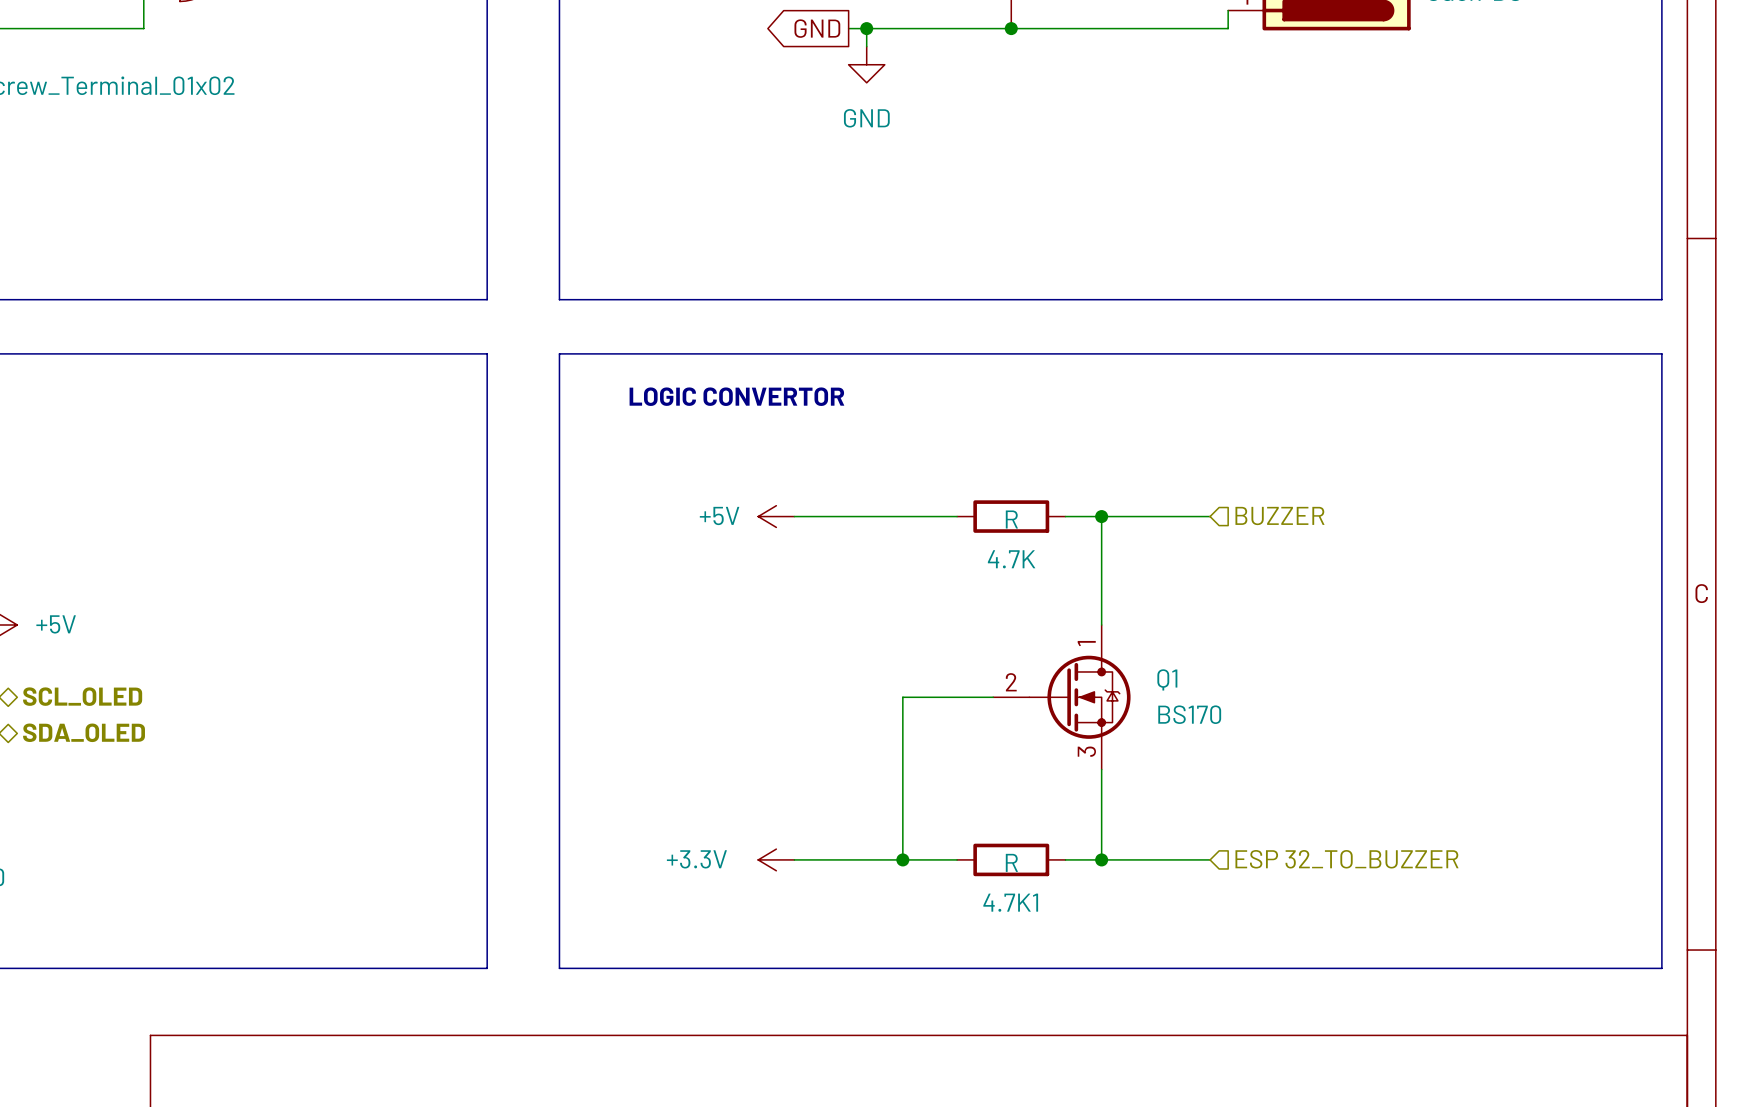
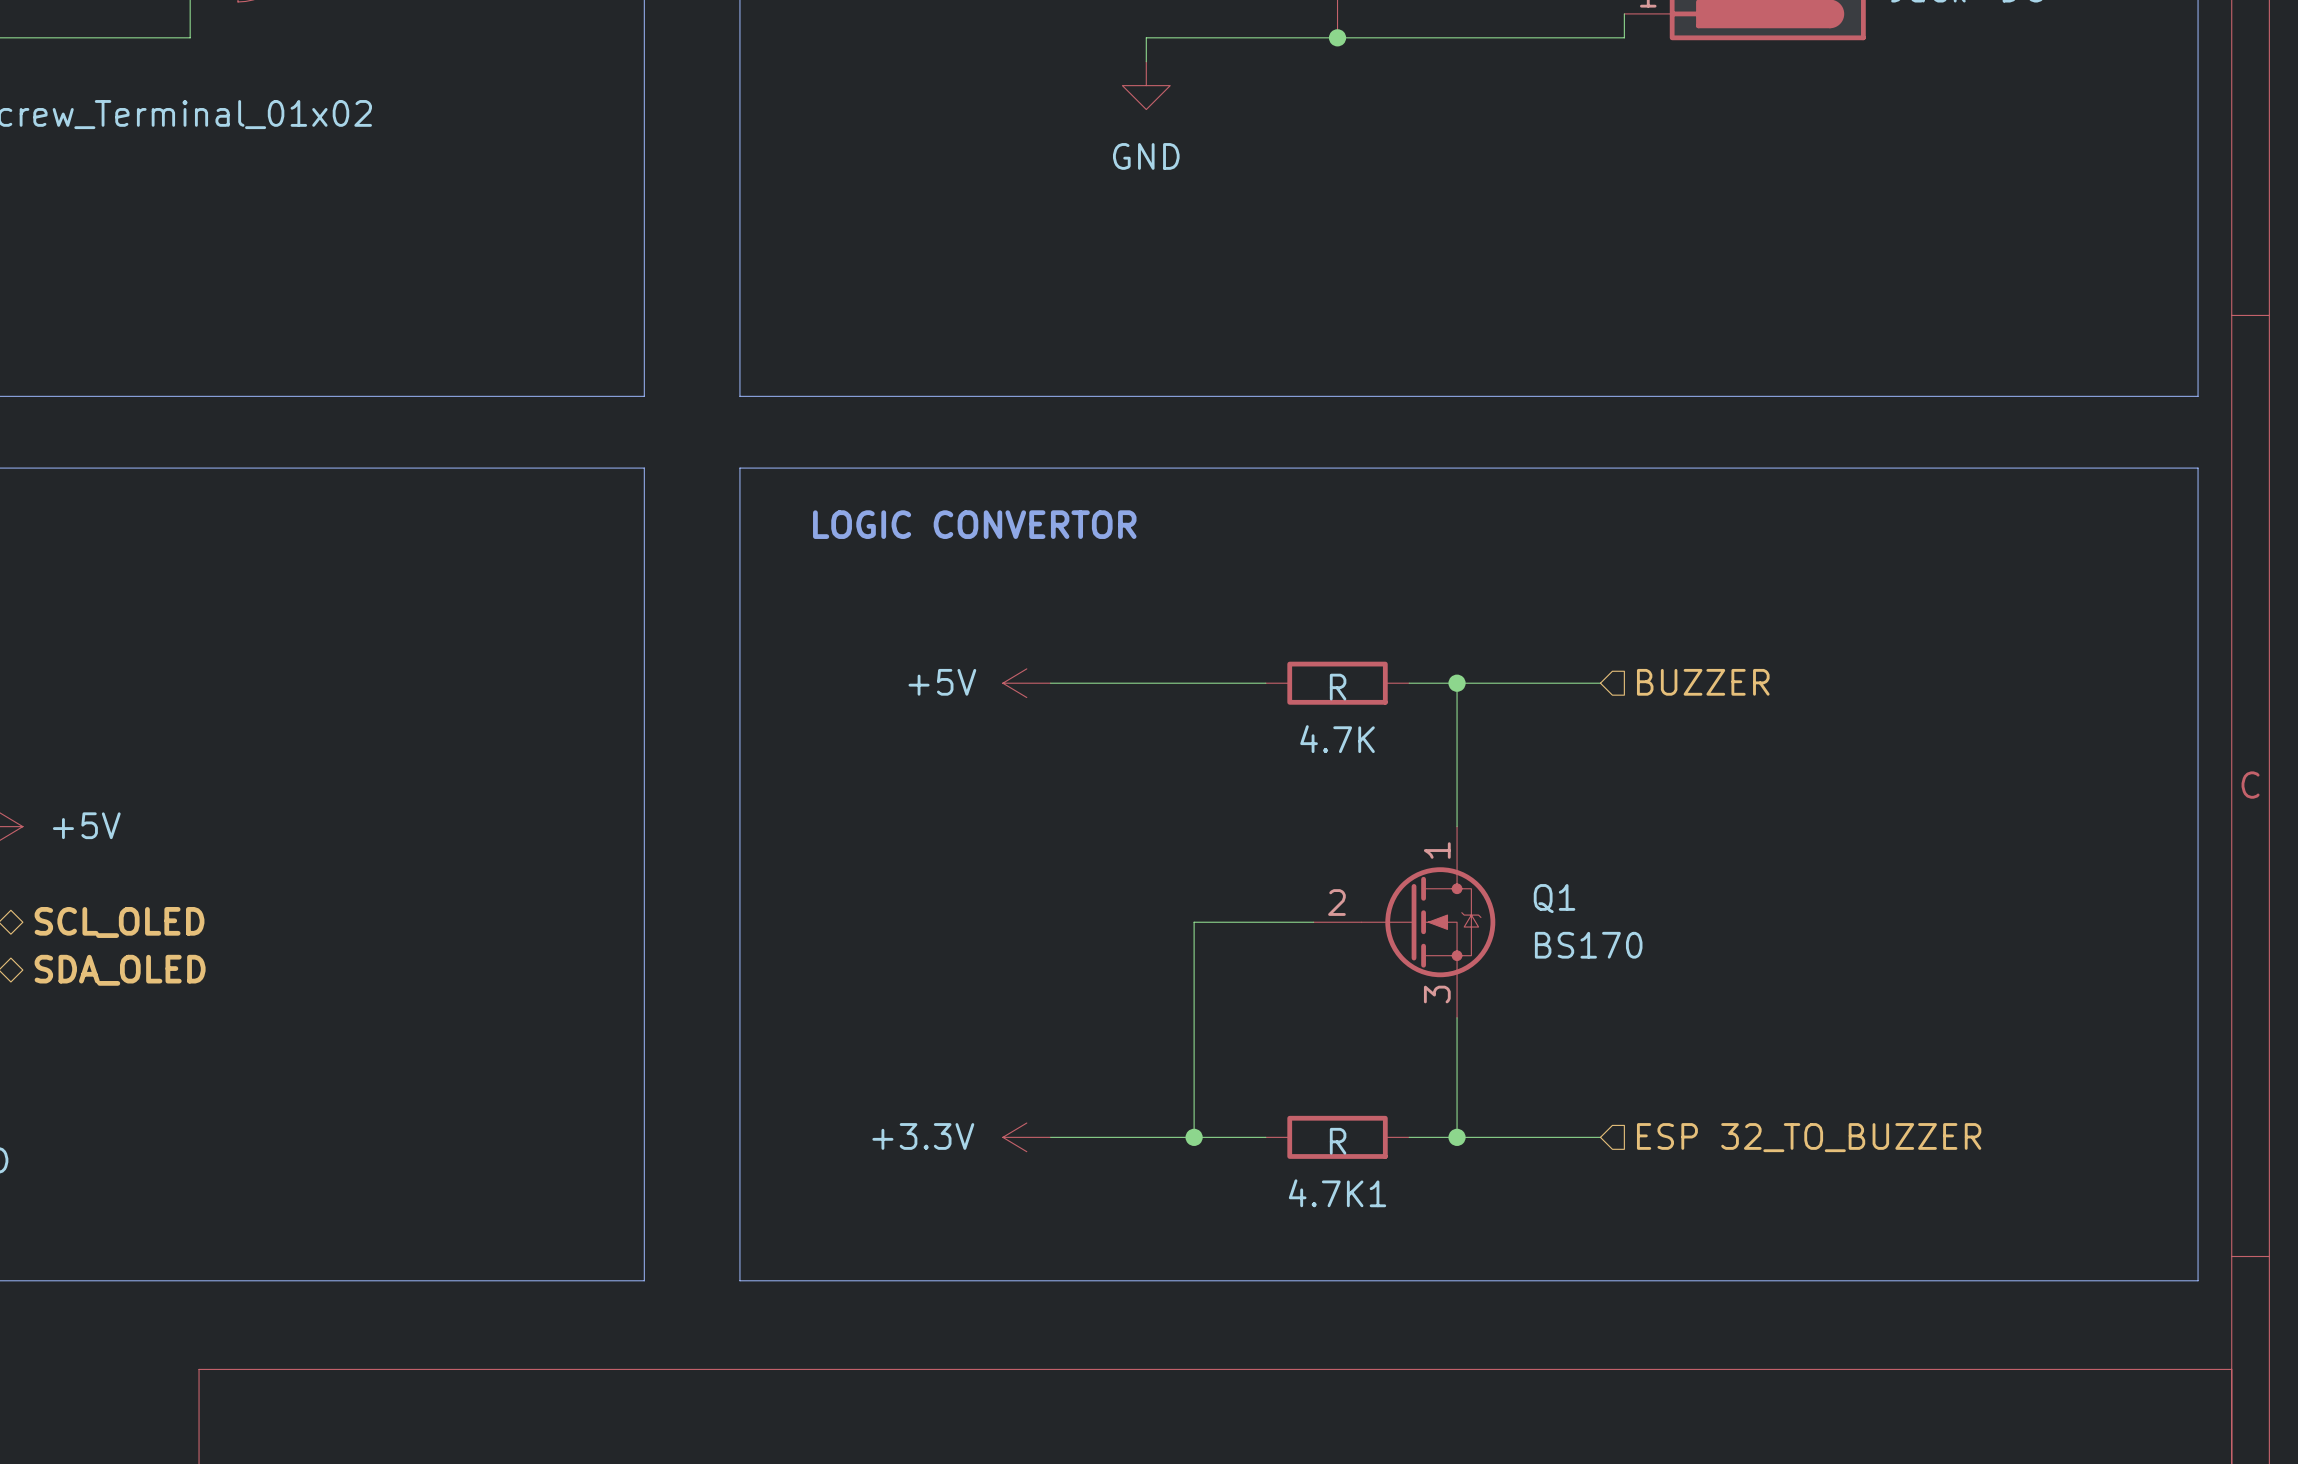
global label: GND (817, 28) -> none
wire: (848, 28) (866, 28) -> none
junction: (866, 28) -> none

